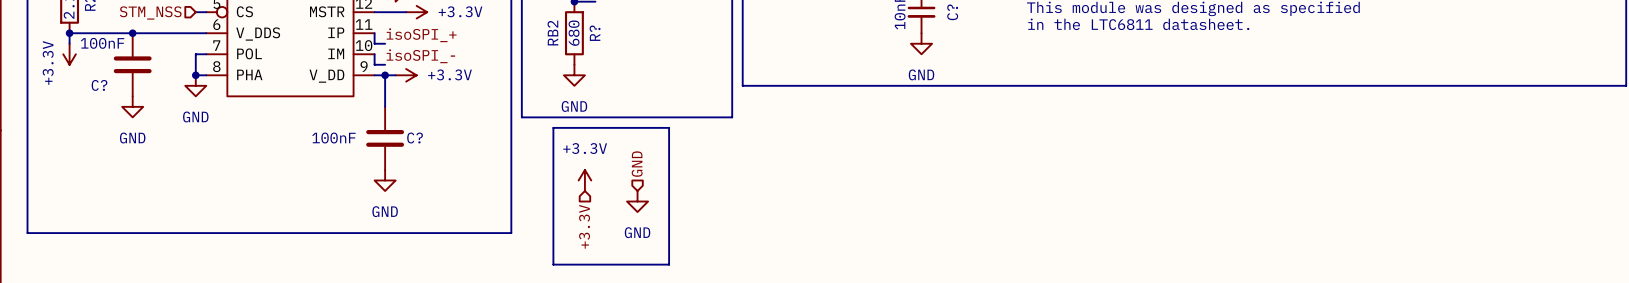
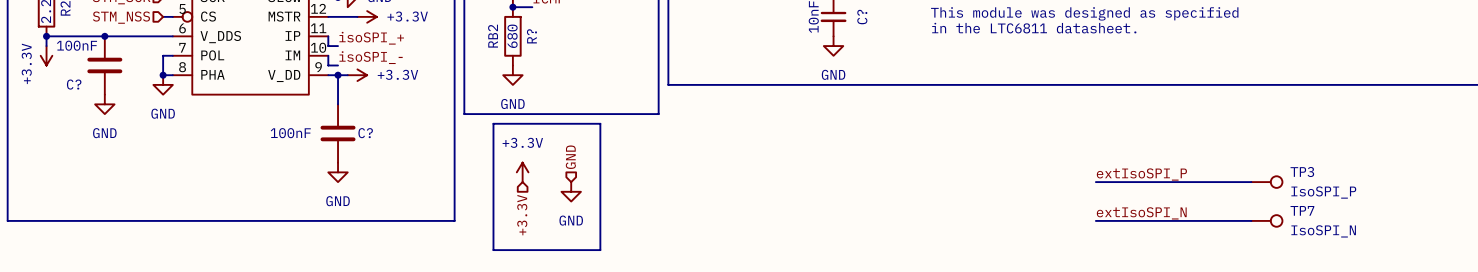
label: none -> extIsoSPI_P (1141, 174)
wire: none -> (1095, 182) (1251, 182)
TP3: none -> IsoSPI_P (1266, 182)
label: none -> extIsoSPI_N (1141, 213)
wire: none -> (1095, 220) (1251, 220)
TP7: none -> IsoSPI_N (1266, 220)

